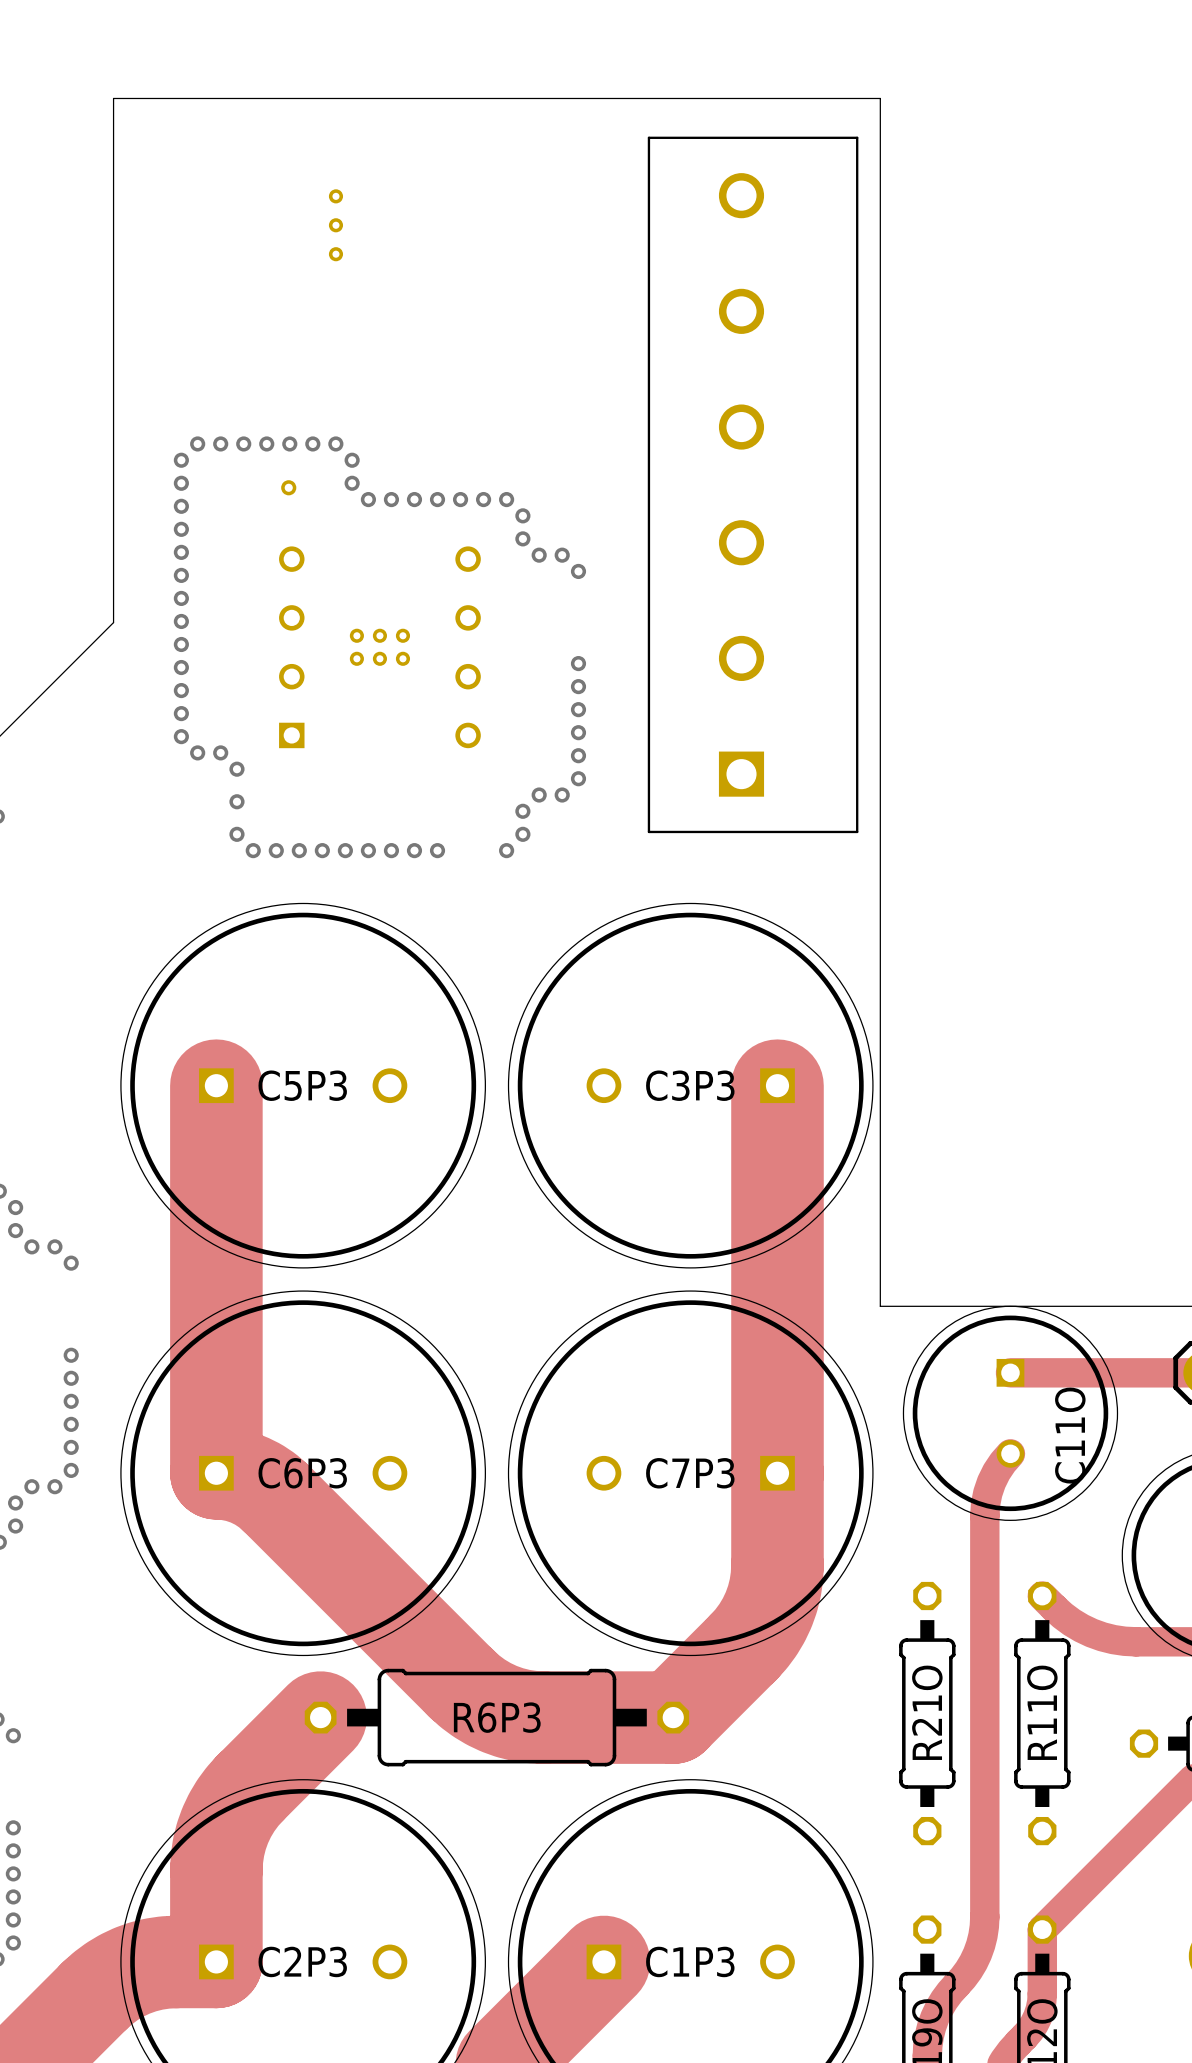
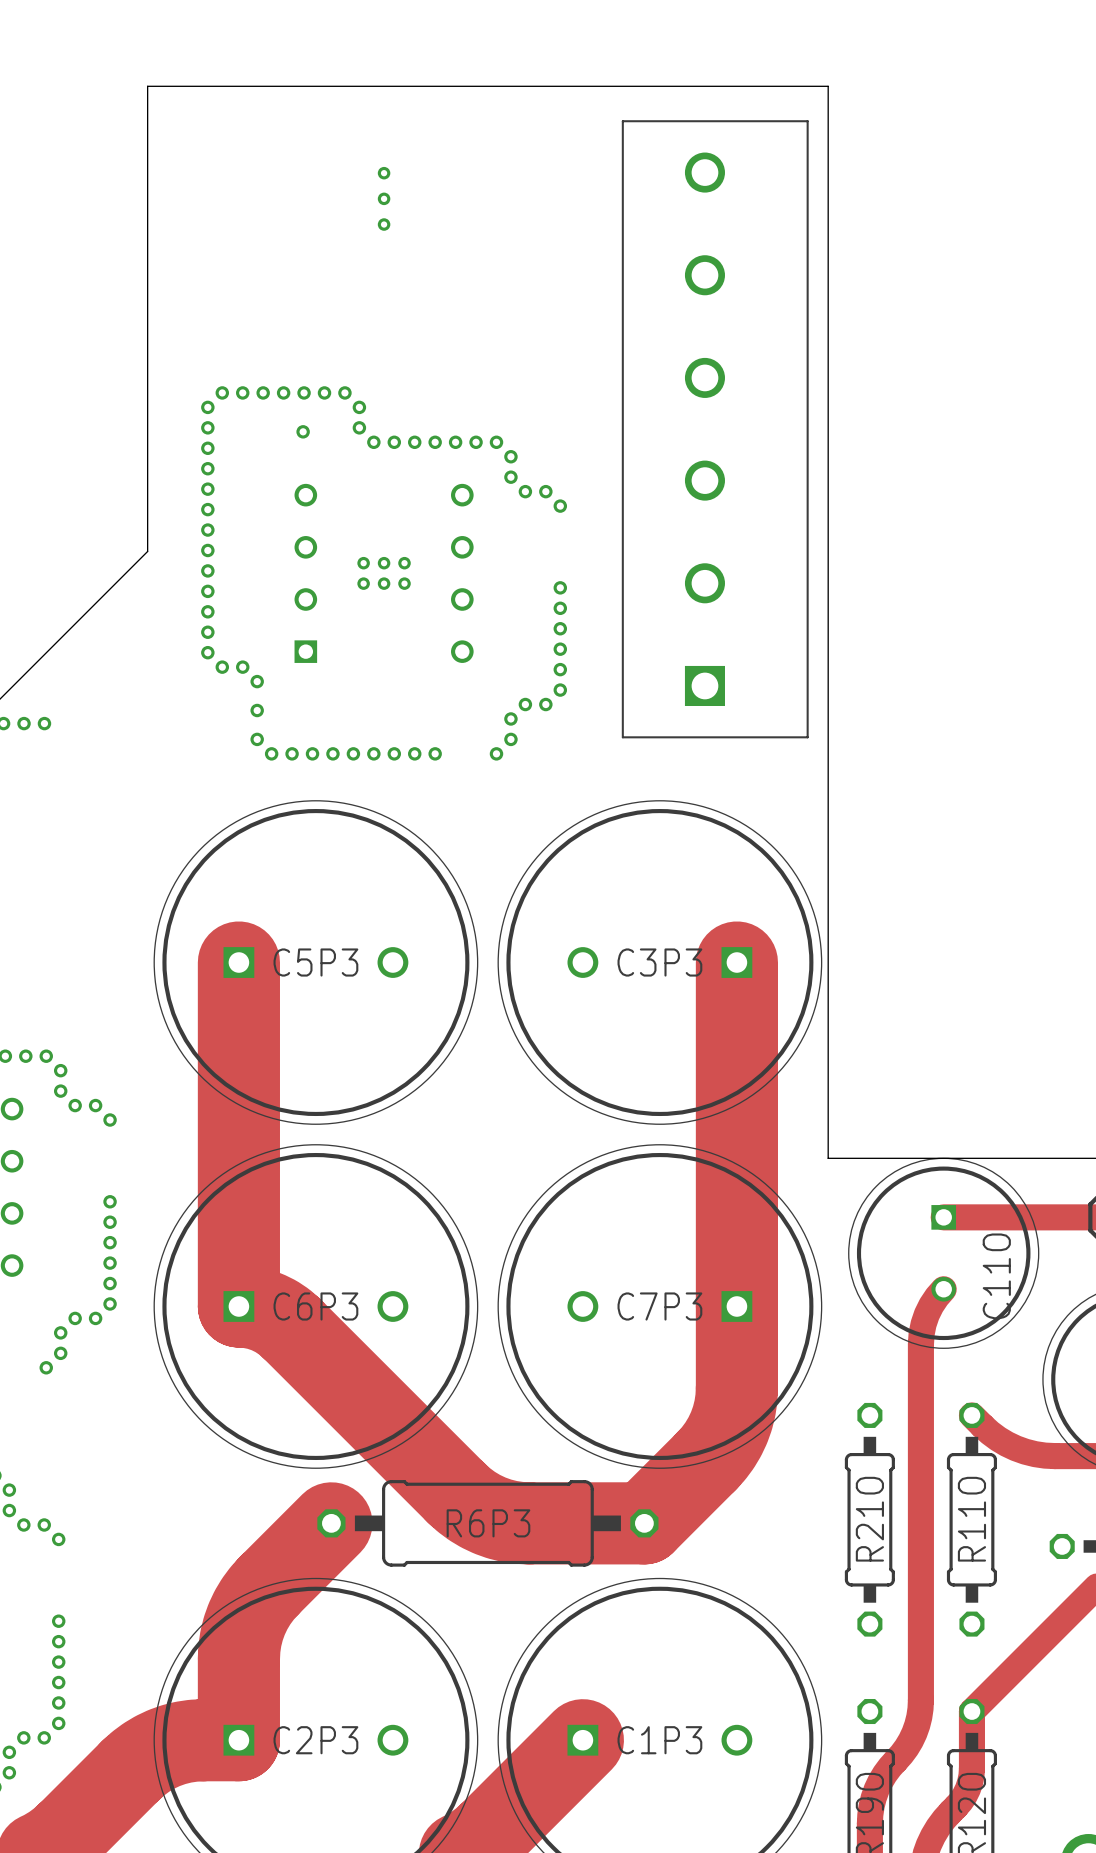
part position: (335, 225) -> (384, 198)

